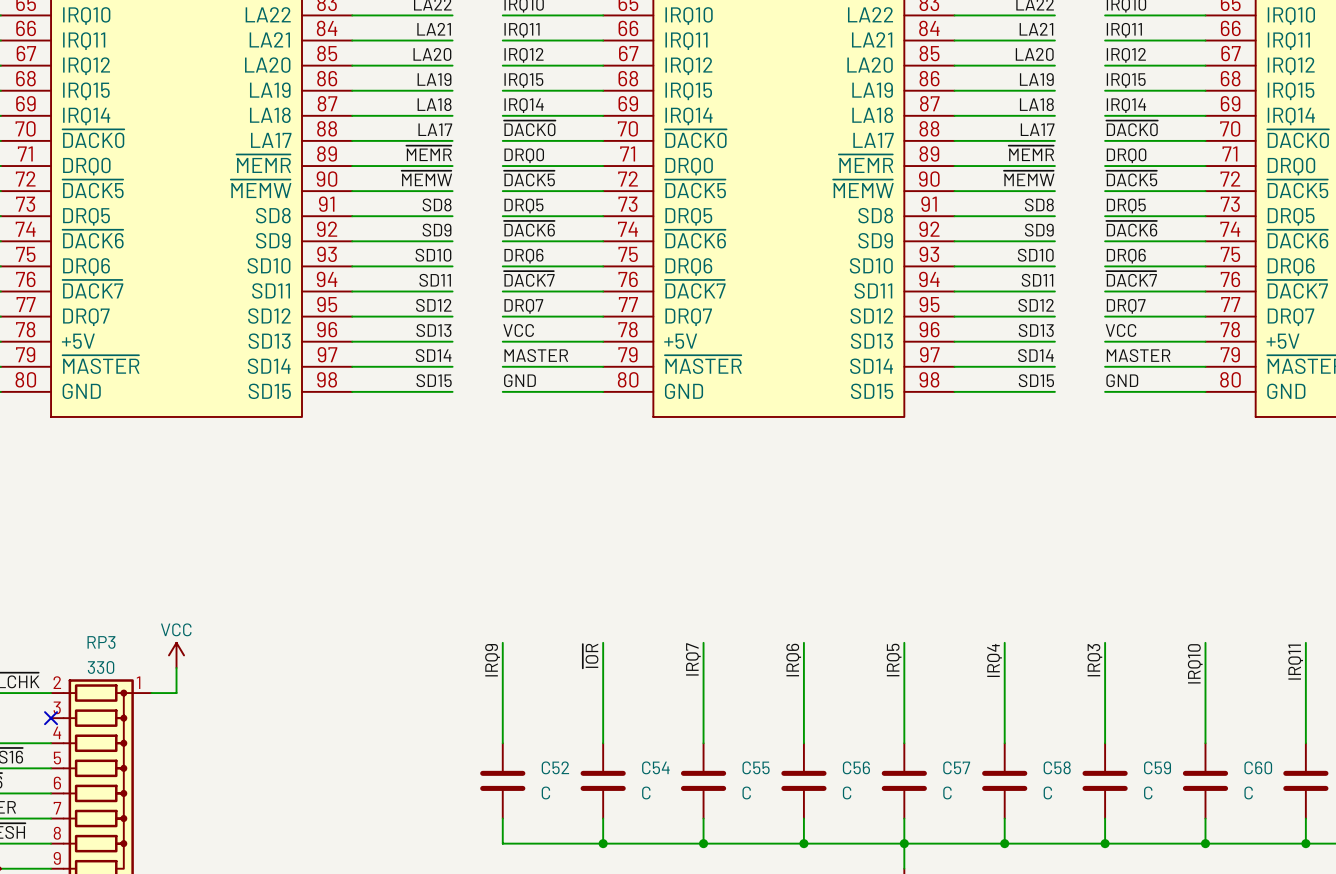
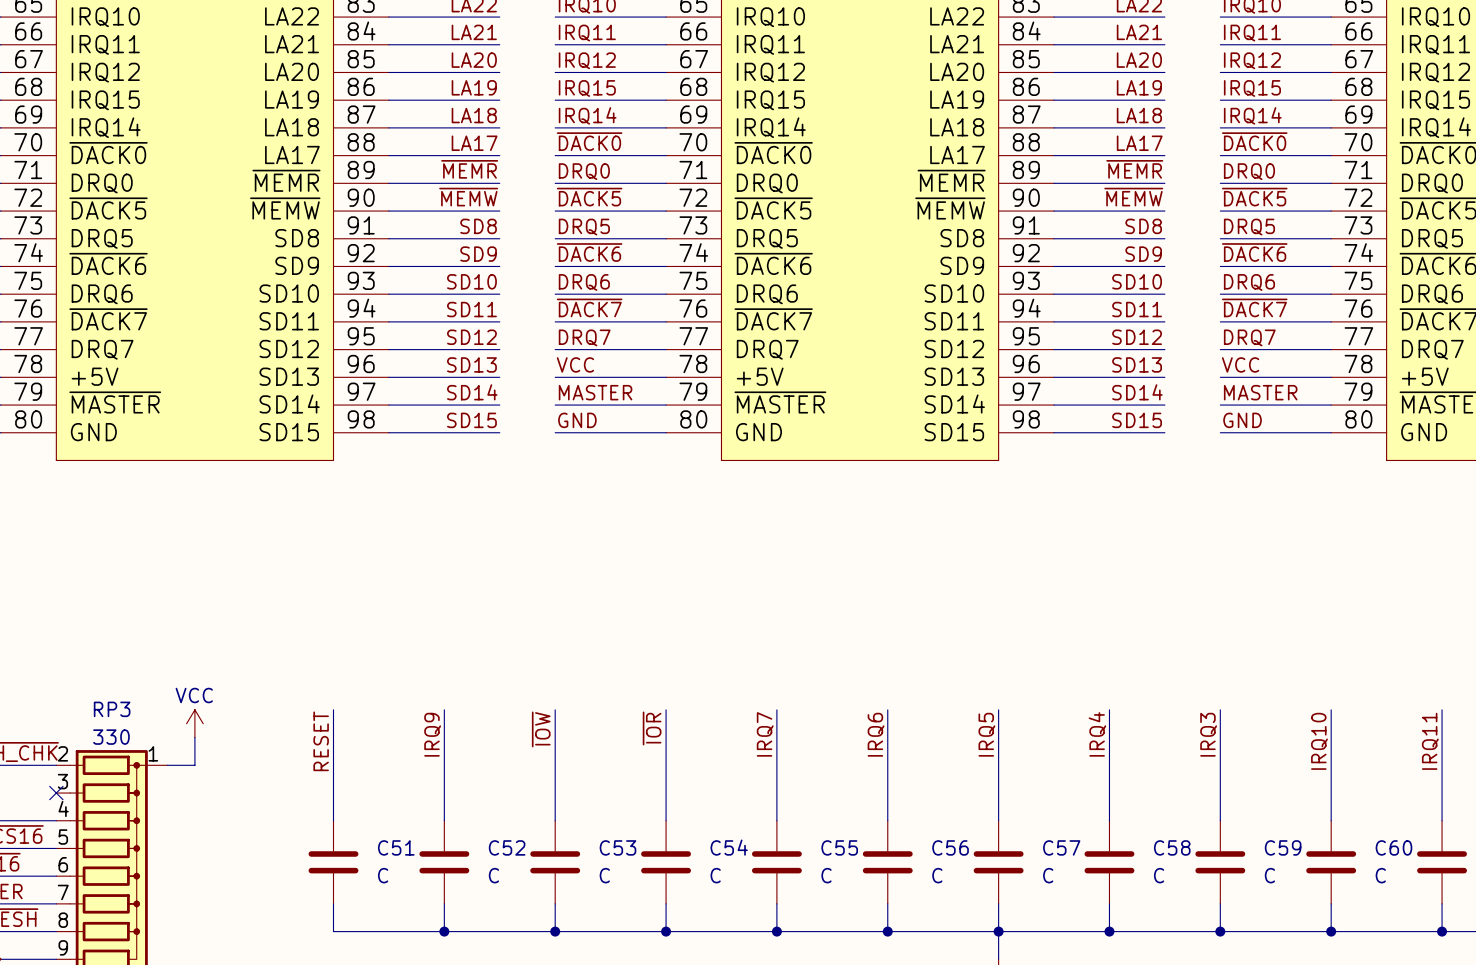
wire: none -> (333, 709) (333, 820)
wire: none -> (444, 709) (444, 820)
label: none -> IRQ9 (432, 734)
label: IRQ9 (492, 660) -> ~{IOW} (541, 729)
label: none -> RESET (321, 741)
C52 name: C52 (555, 767) -> C53 (617, 847)
C51: none -> C (333, 862)
C52: none -> C (444, 862)
wire: none -> (333, 903) (333, 931) (555, 931)
wire: none -> (444, 903) (444, 931)
junction: none -> (444, 931)
junction: none -> (555, 931)

